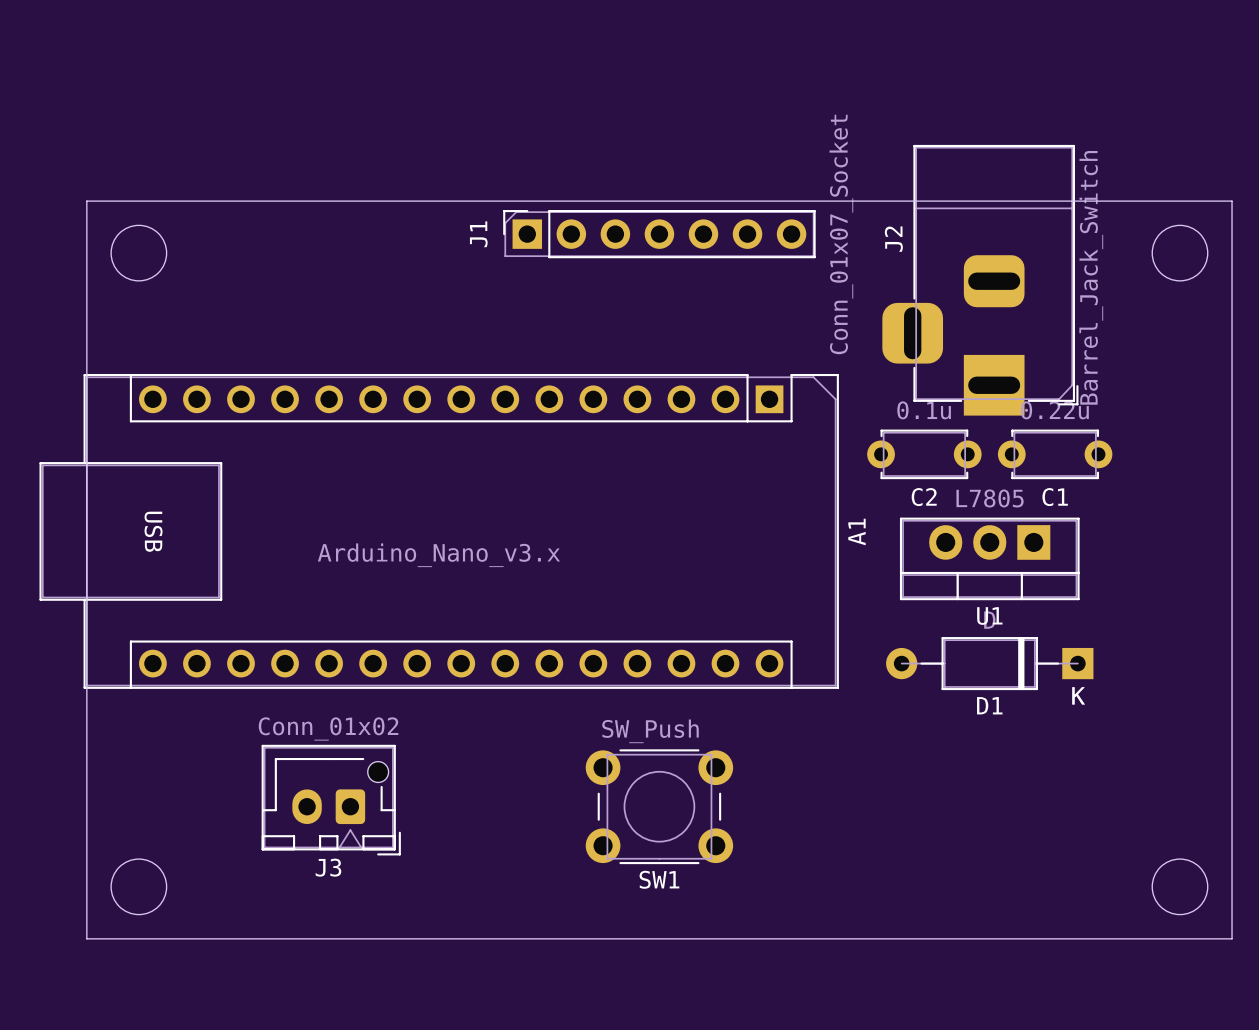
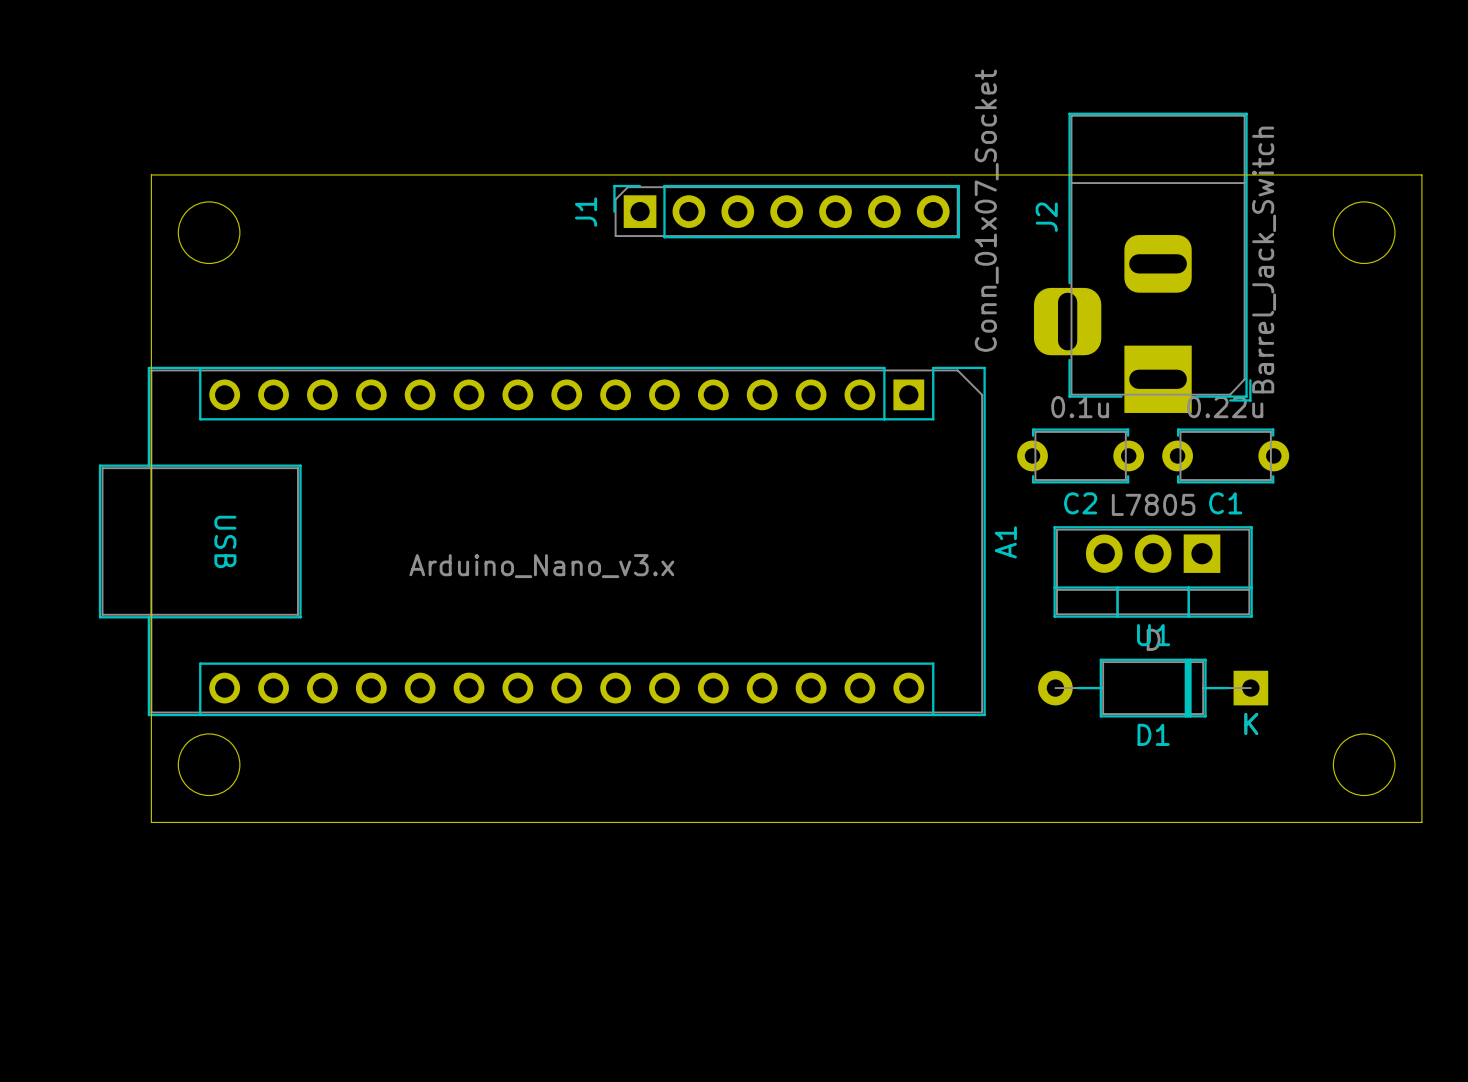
board edge: (86, 784) (86, 938) (1232, 938) (1232, 784) -> (151, 822) (1421, 822)
J3: Conn_01x02 (331, 800) -> none
SW1: SW_Push (659, 806) -> none
round board edge position: (138, 886) -> (209, 764)
round board edge position: (1179, 886) -> (1364, 764)

